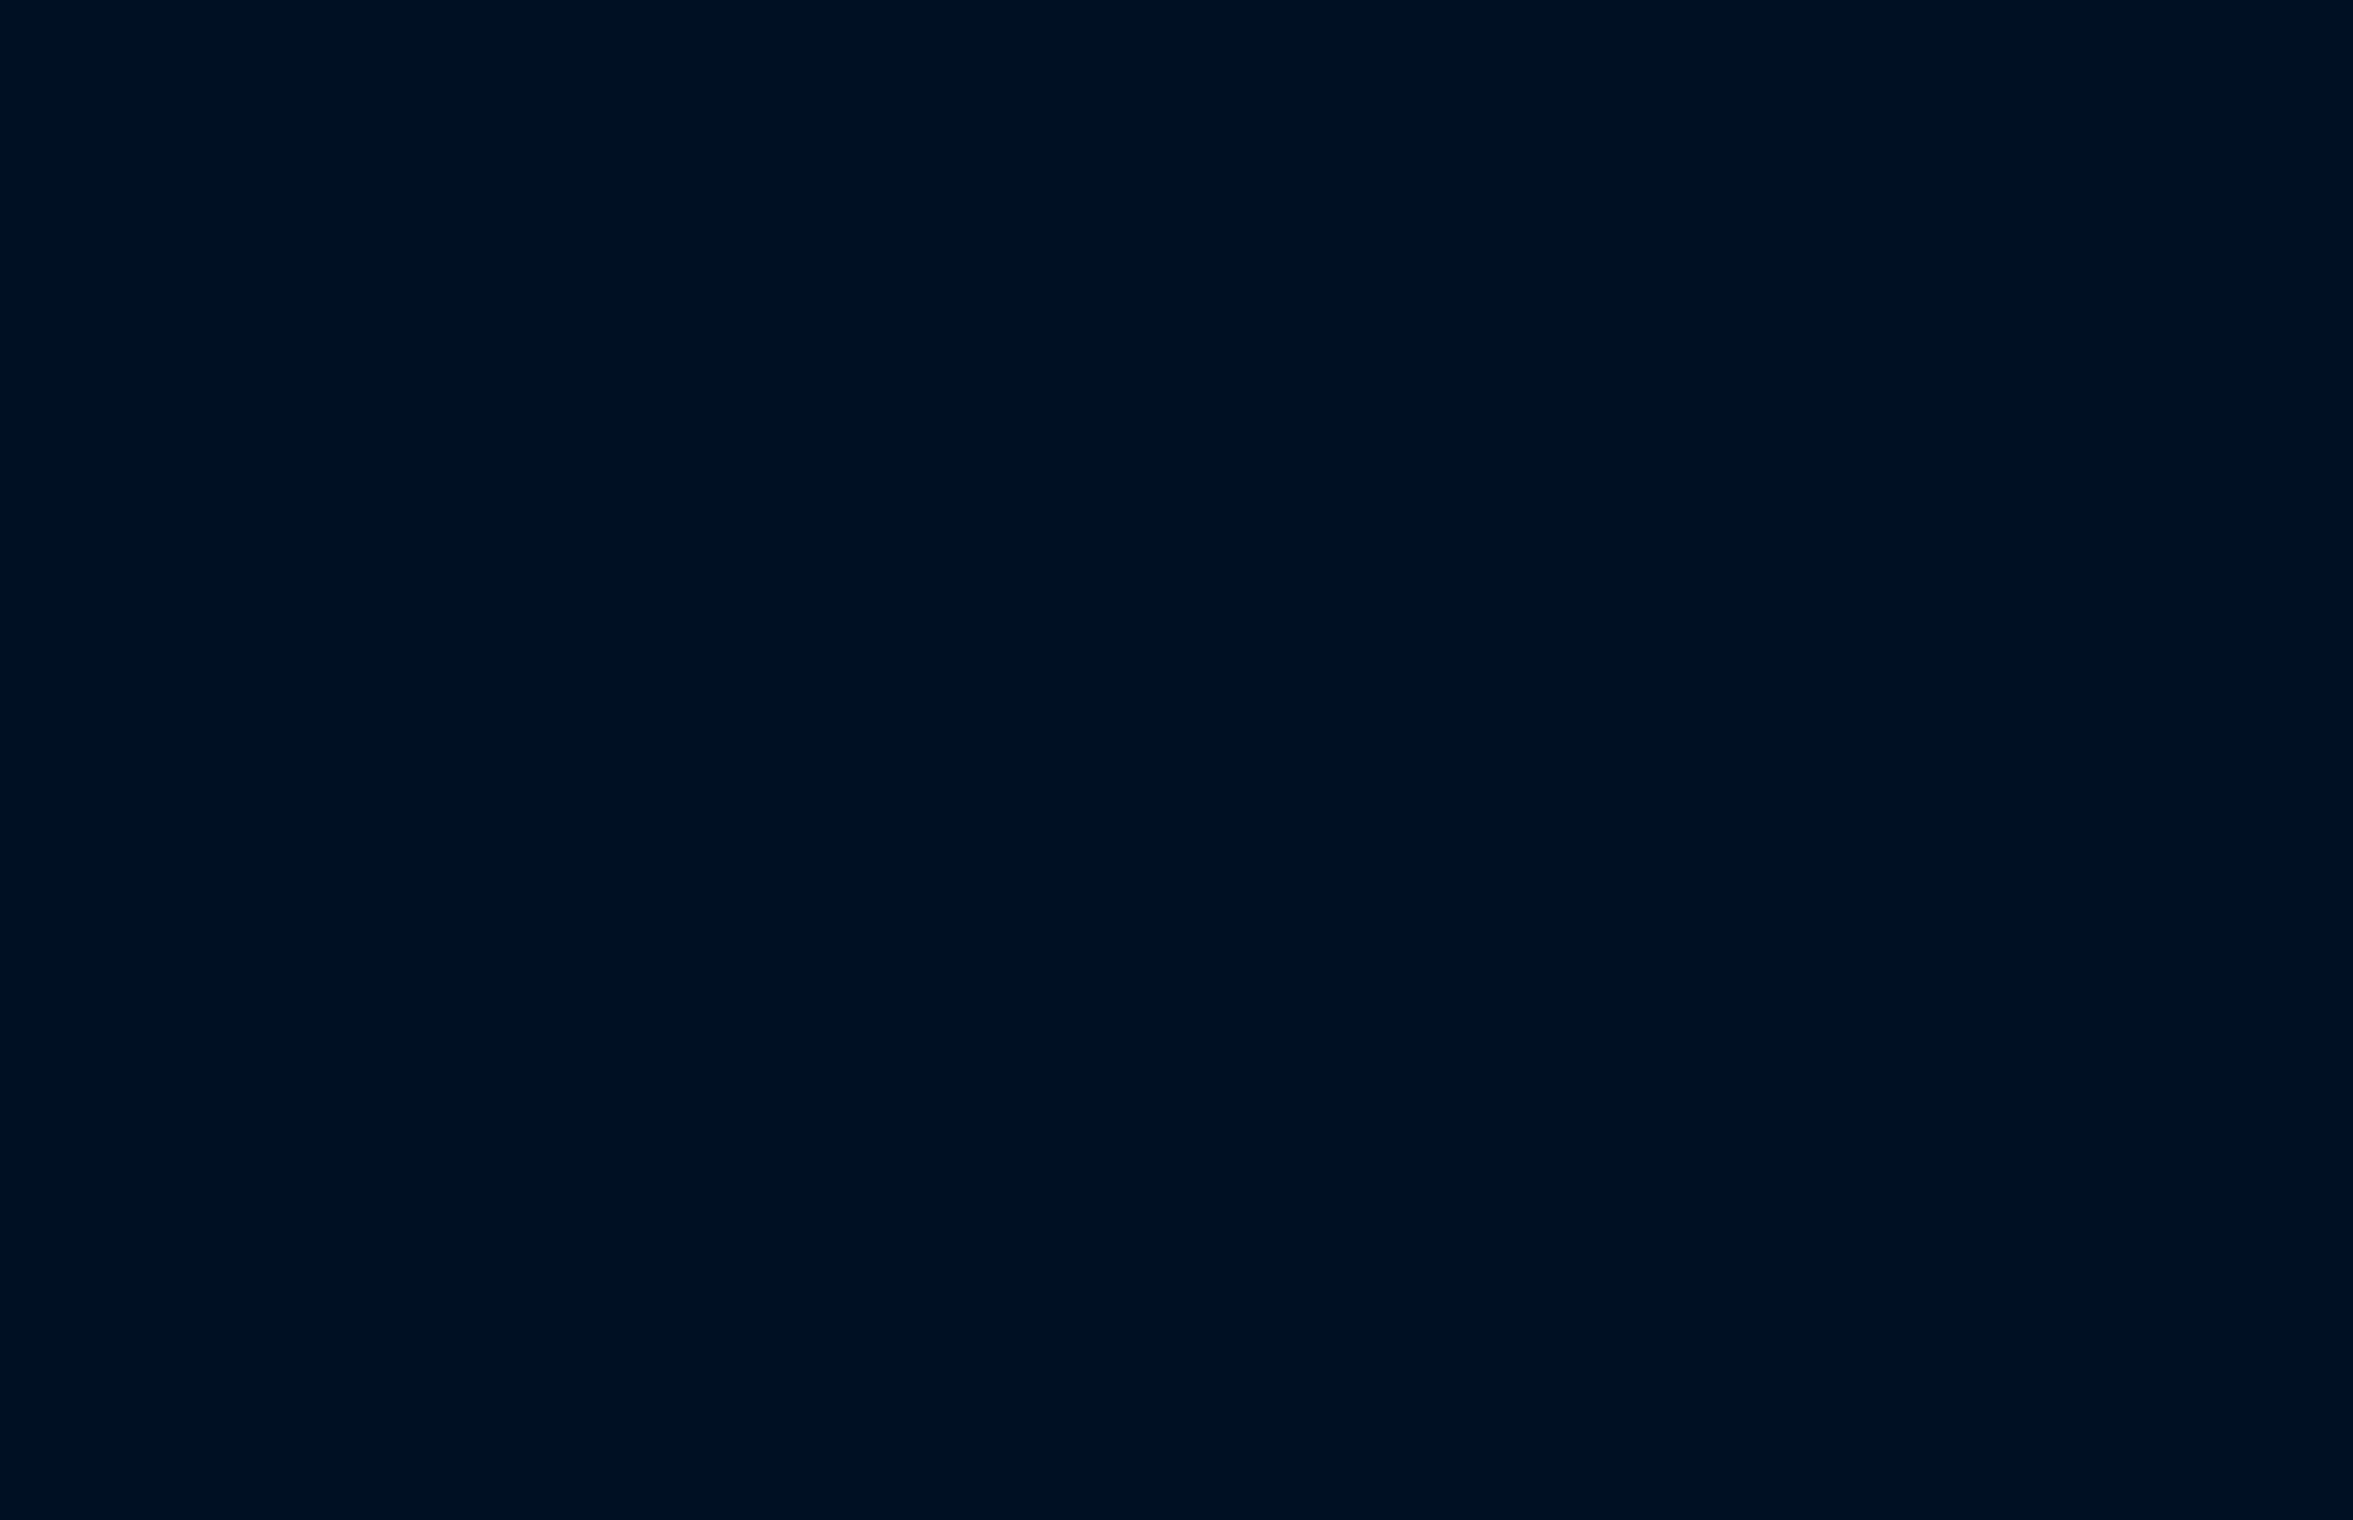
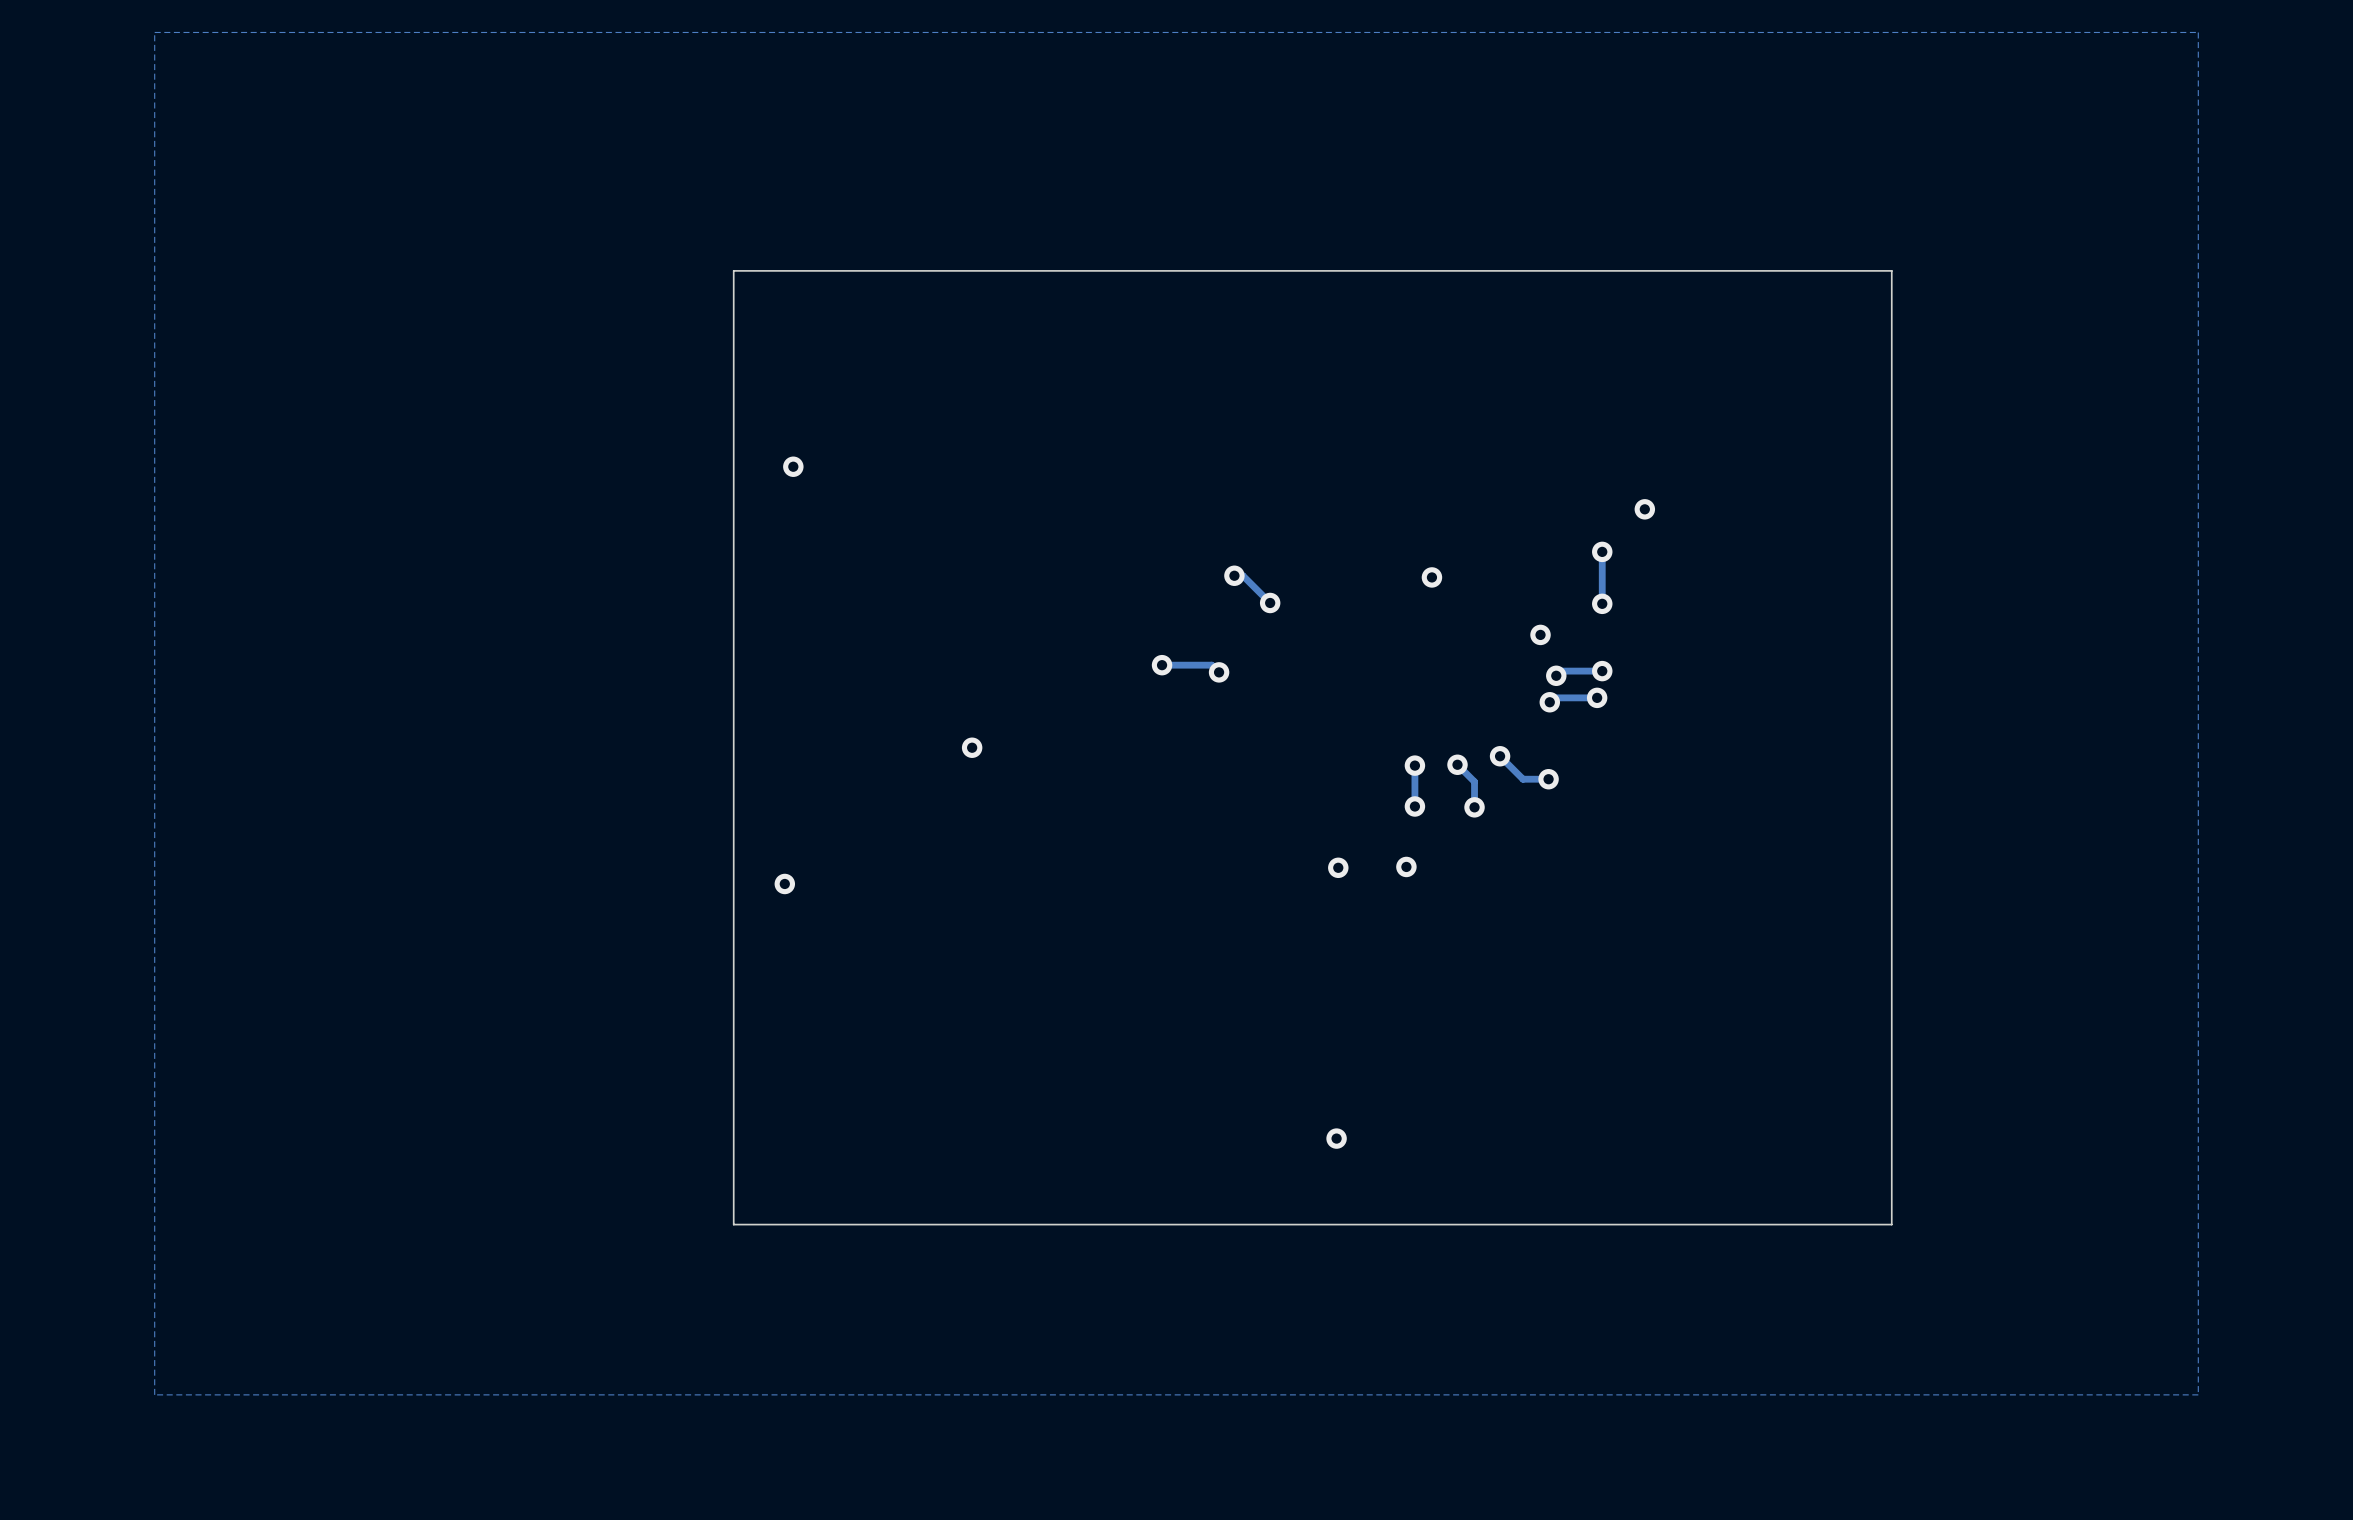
zone outline: none -> (2198, 32) (2198, 1394) (154, 1394) (154, 32) (2198, 32)
board edge: none -> (1891, 270) (733, 270) (733, 1224) (1891, 1224) (1891, 270)
via: none -> (793, 466)
via: none -> (1644, 509)
track: none -> (1602, 551) (1602, 603)
via: none -> (1602, 551)
track: none -> (1234, 575) (1242, 575) (1270, 602)
via: none -> (1234, 575)
via: none -> (1431, 577)
via: none -> (1270, 602)
via: none -> (1602, 603)
via: none -> (1540, 634)
track: none -> (1162, 665) (1211, 665) (1219, 672)
via: none -> (1162, 665)
track: none -> (1602, 671) (1560, 671) (1556, 675)
via: none -> (1602, 671)
via: none -> (1219, 672)
via: none -> (1556, 675)
track: none -> (1597, 697) (1554, 697) (1549, 702)
via: none -> (1597, 697)
via: none -> (1549, 702)
via: none -> (972, 747)
track: none -> (1500, 756) (1523, 779) (1548, 779)
via: none -> (1500, 756)
track: none -> (1457, 764) (1474, 781) (1474, 807)
via: none -> (1457, 764)
track: none -> (1414, 765) (1414, 806)
via: none -> (1414, 765)
via: none -> (1548, 779)
via: none -> (1414, 806)
via: none -> (1474, 807)
via: none -> (1406, 866)
via: none -> (1338, 867)
via: none -> (784, 883)
via: none -> (1336, 1138)

